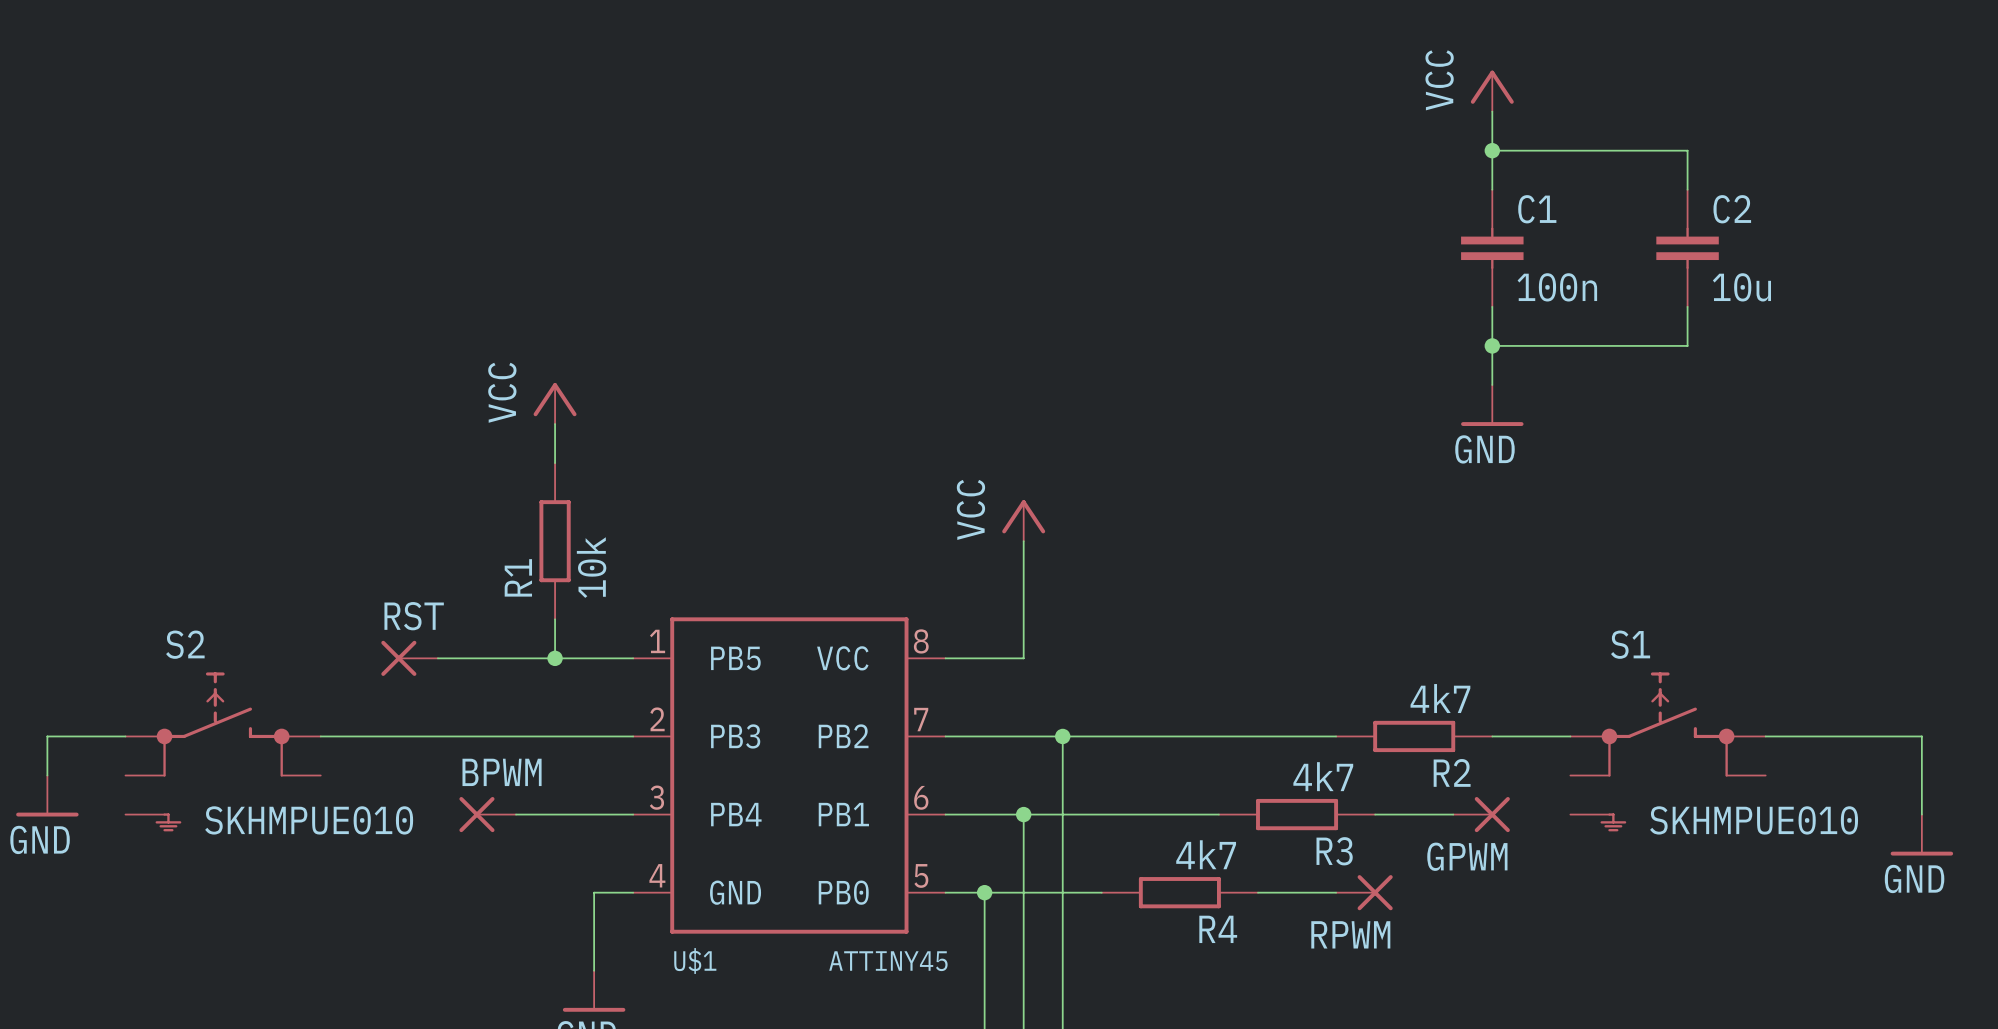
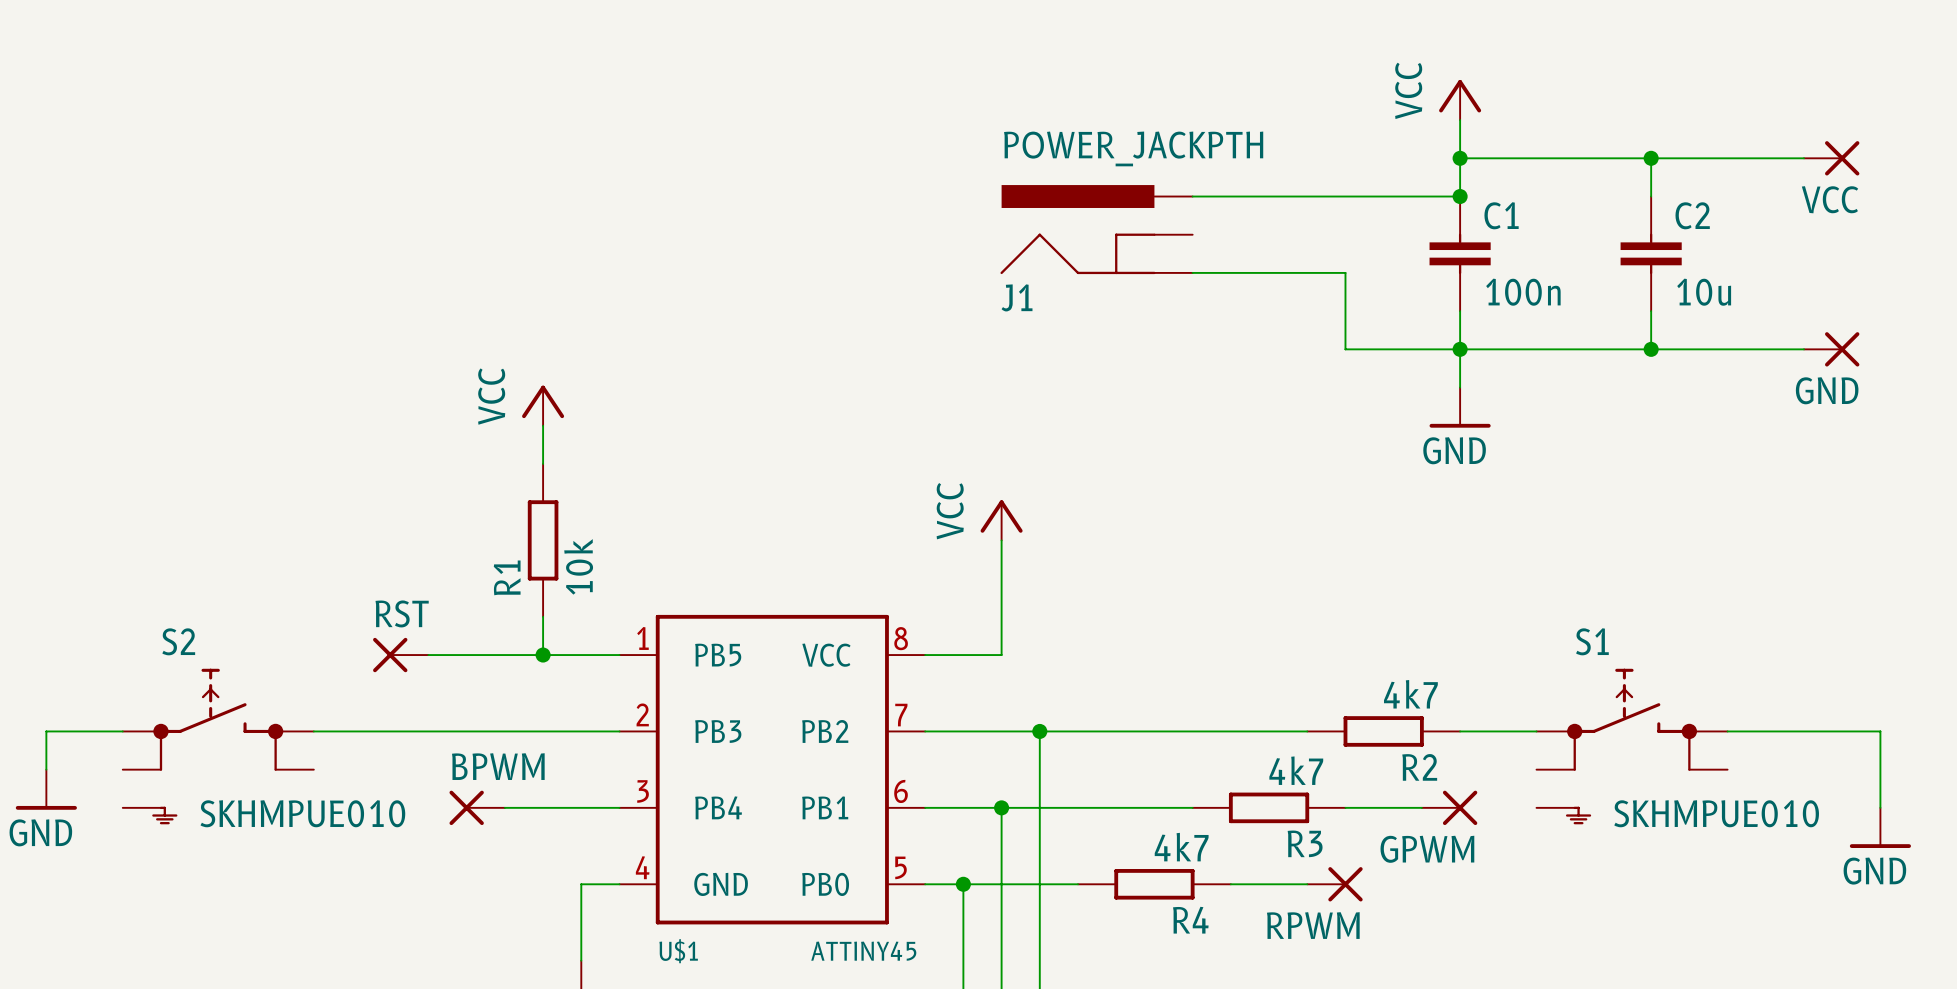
wire: none -> (1651, 158) (1803, 158)
junction: none -> (1651, 158)
VCC: none -> (1831, 158)
wire: none -> (1192, 196) (1460, 196)
junction: none -> (1460, 196)
J1: none -> POWER_JACKPTH (1096, 229)
wire: none -> (1192, 272) (1345, 272) (1345, 349) (1460, 349)
wire: none -> (1651, 349) (1803, 349)
junction: none -> (1651, 349)
GND: none -> (1831, 349)

